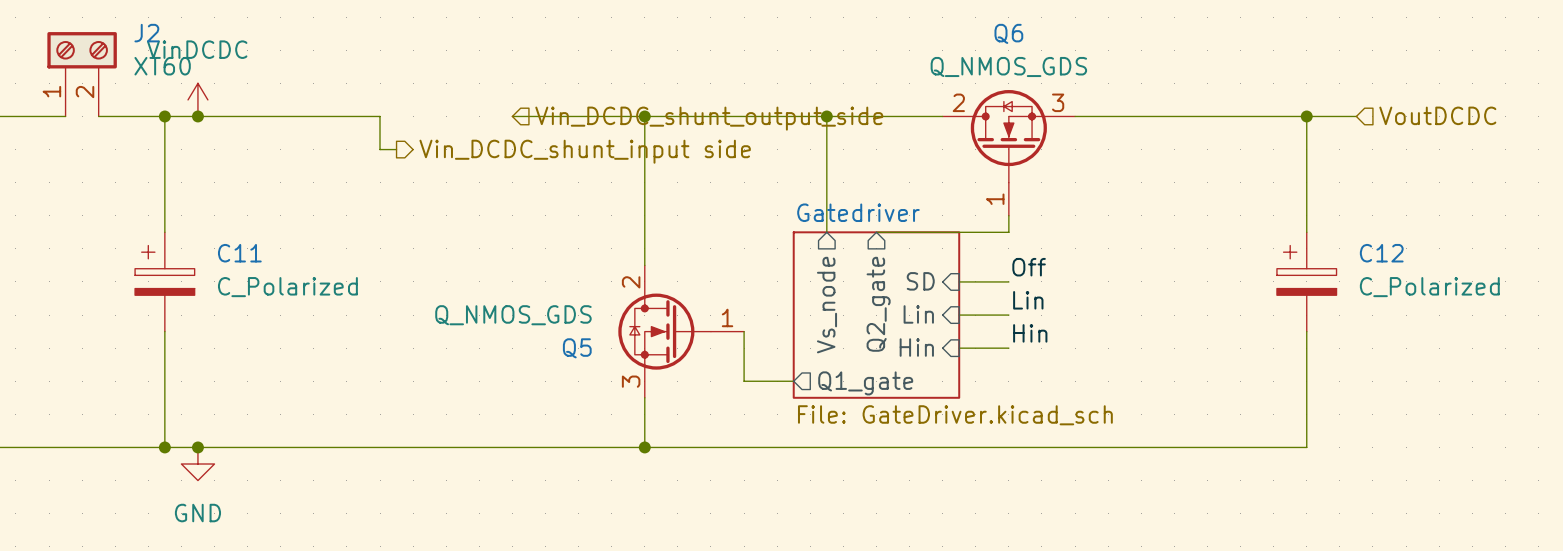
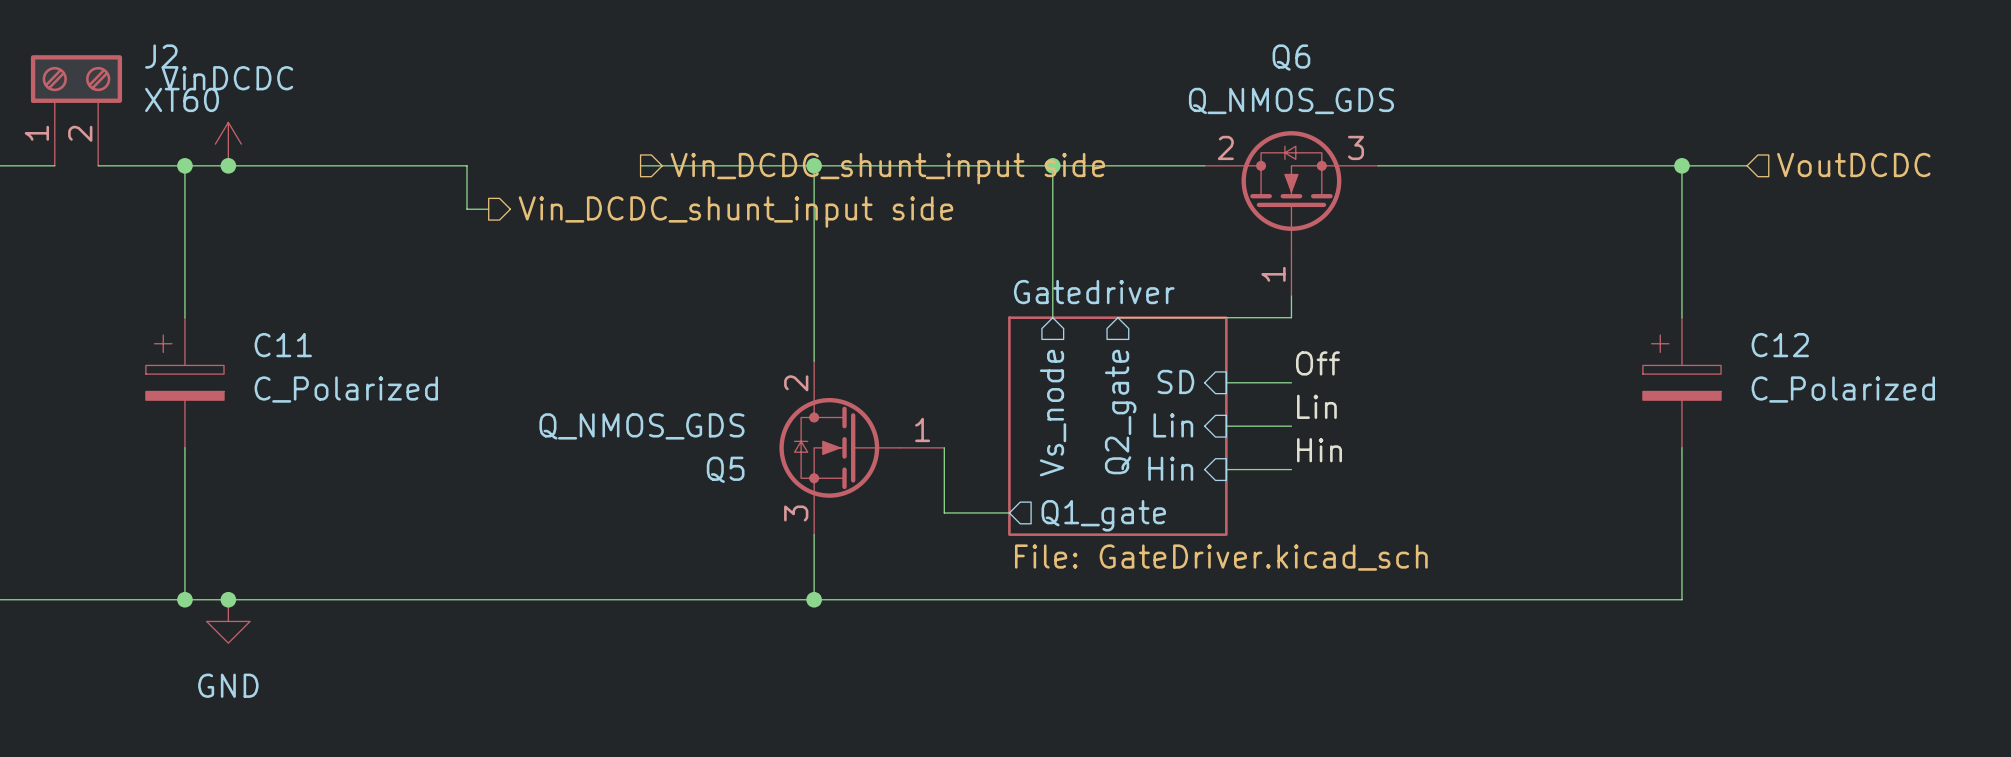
hierarchical label shape: input (709, 118) -> output (887, 168)
hierarchical label: Vin_DCDC_shunt_output_side (709, 118) -> Vin_DCDC_shunt_input side (887, 168)

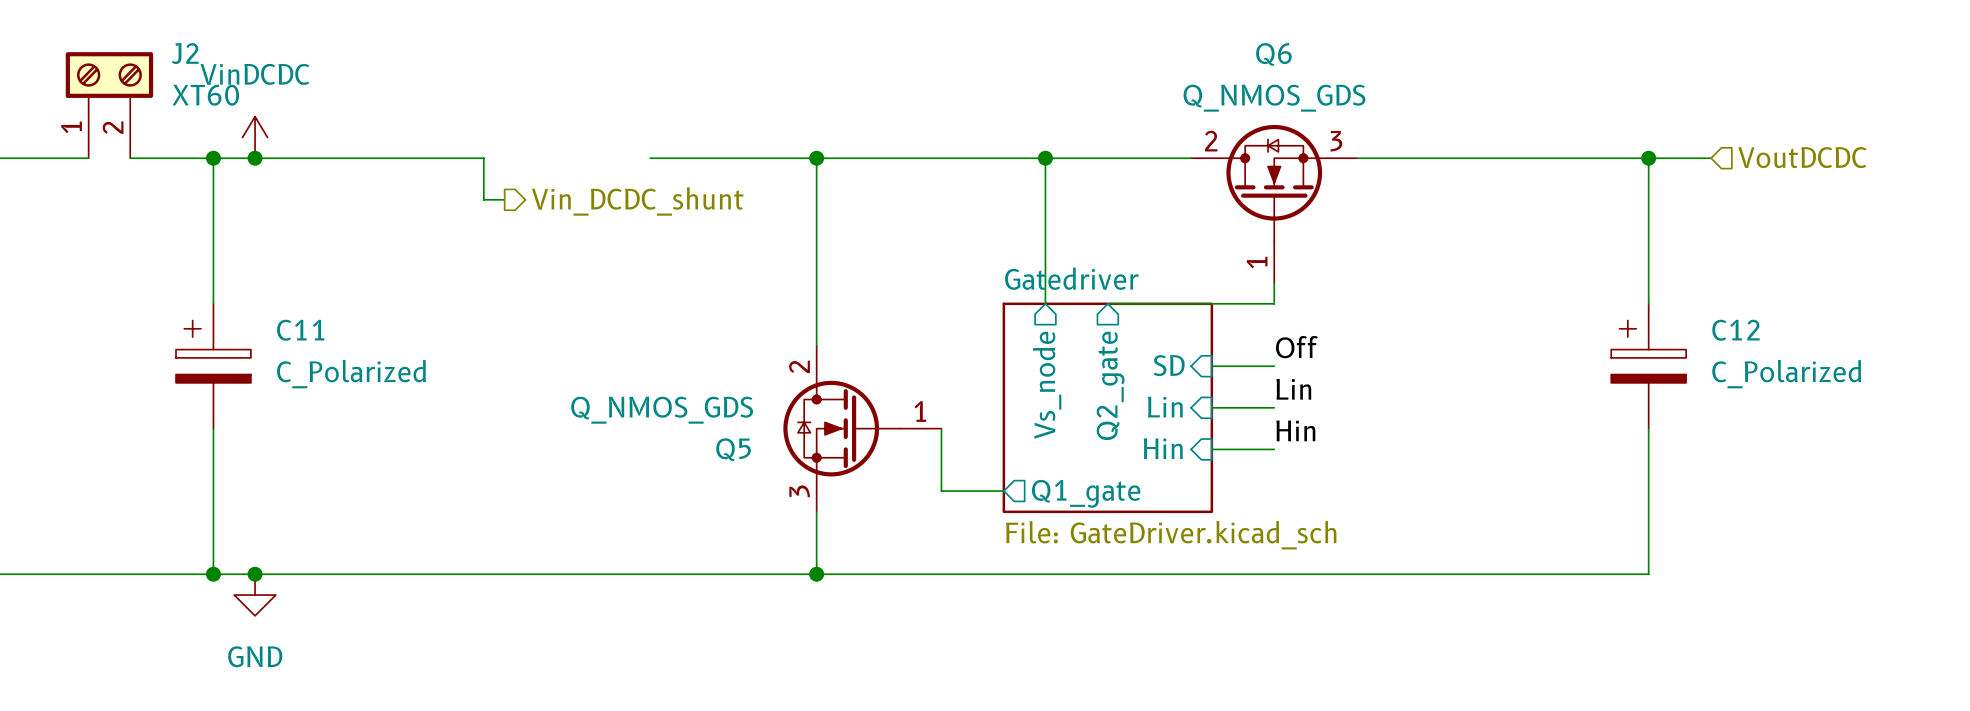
hierarchical label: Vin_DCDC_shunt_input side (887, 168) -> none
hierarchical label: Vin_DCDC_shunt_input side (735, 212) -> Vin_DCDC_shunt (637, 201)

